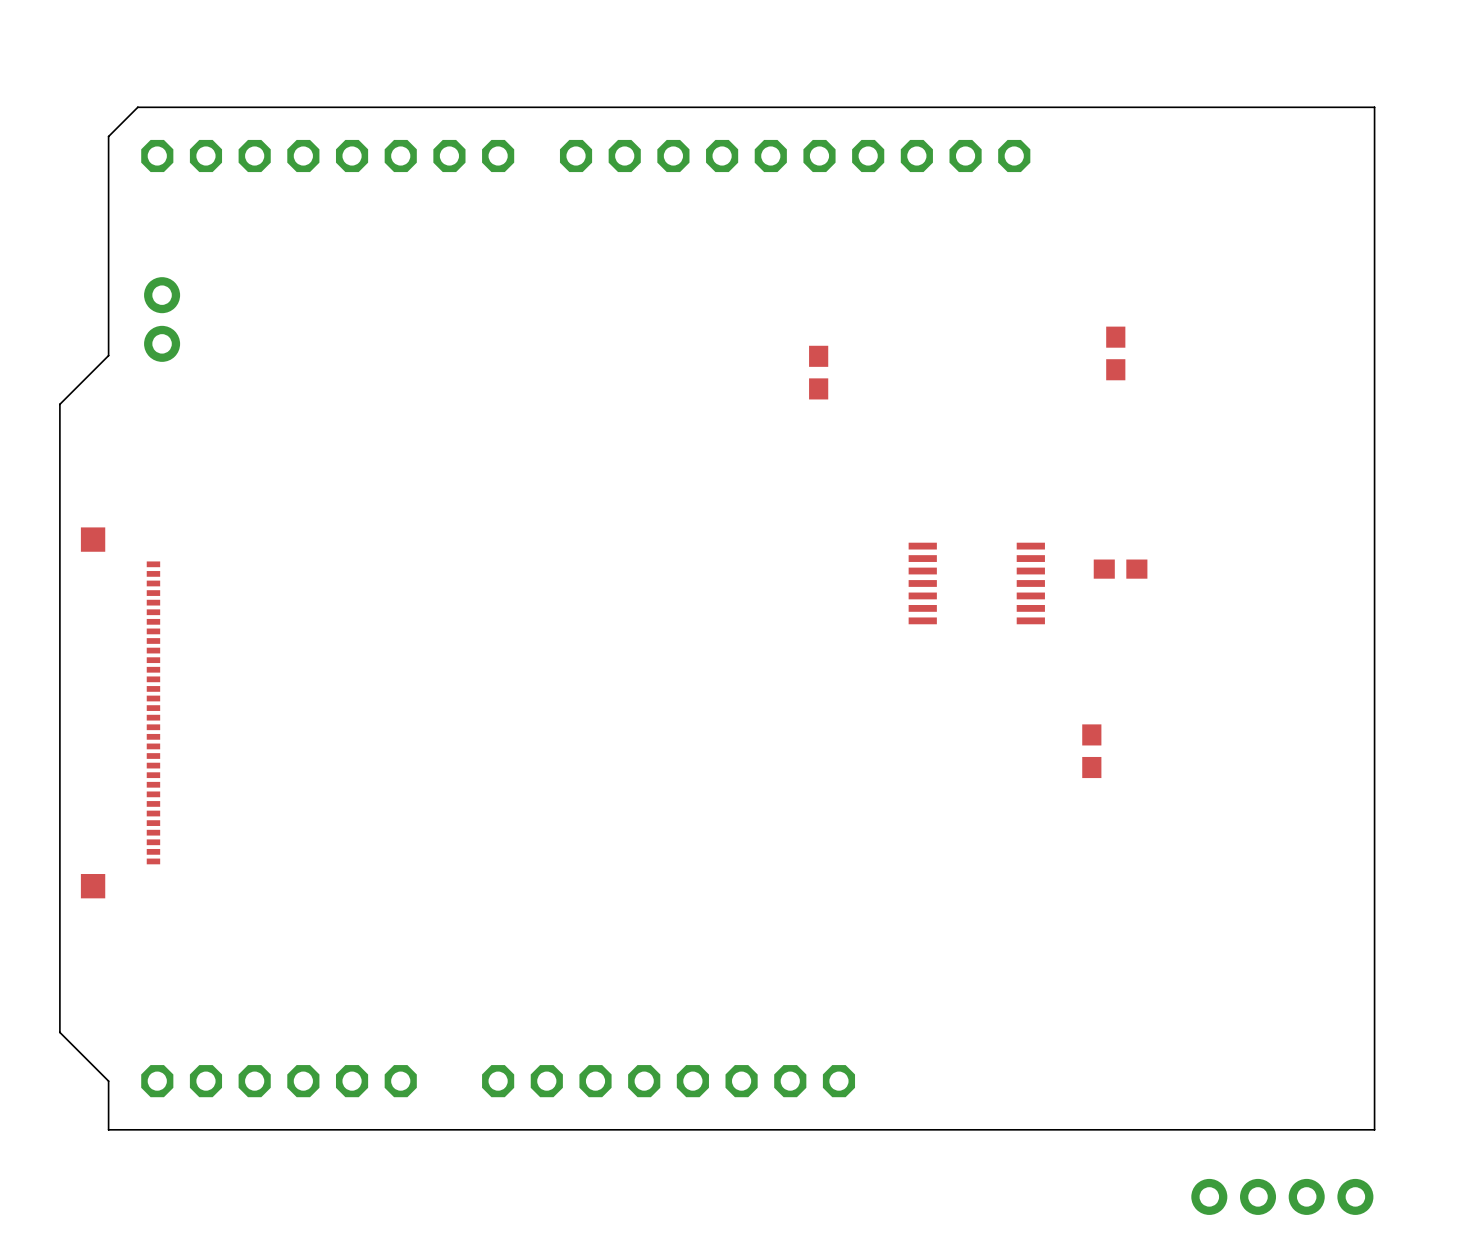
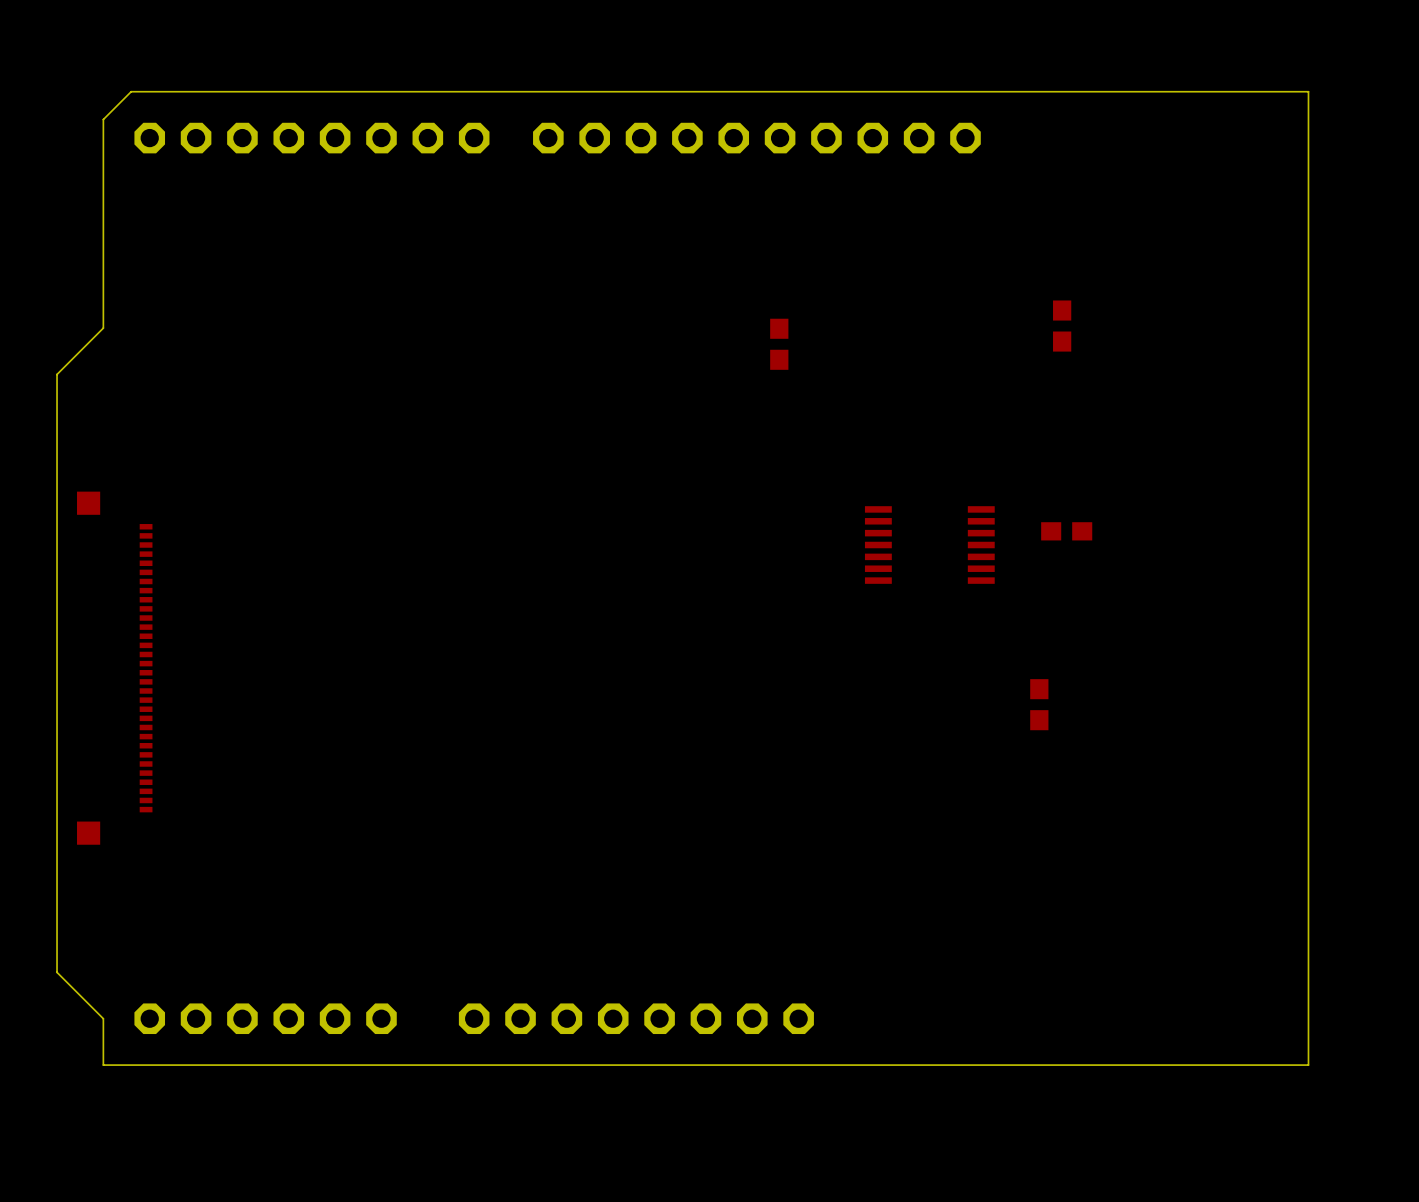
part: (162, 319) -> none
part: (1282, 1196) -> none

